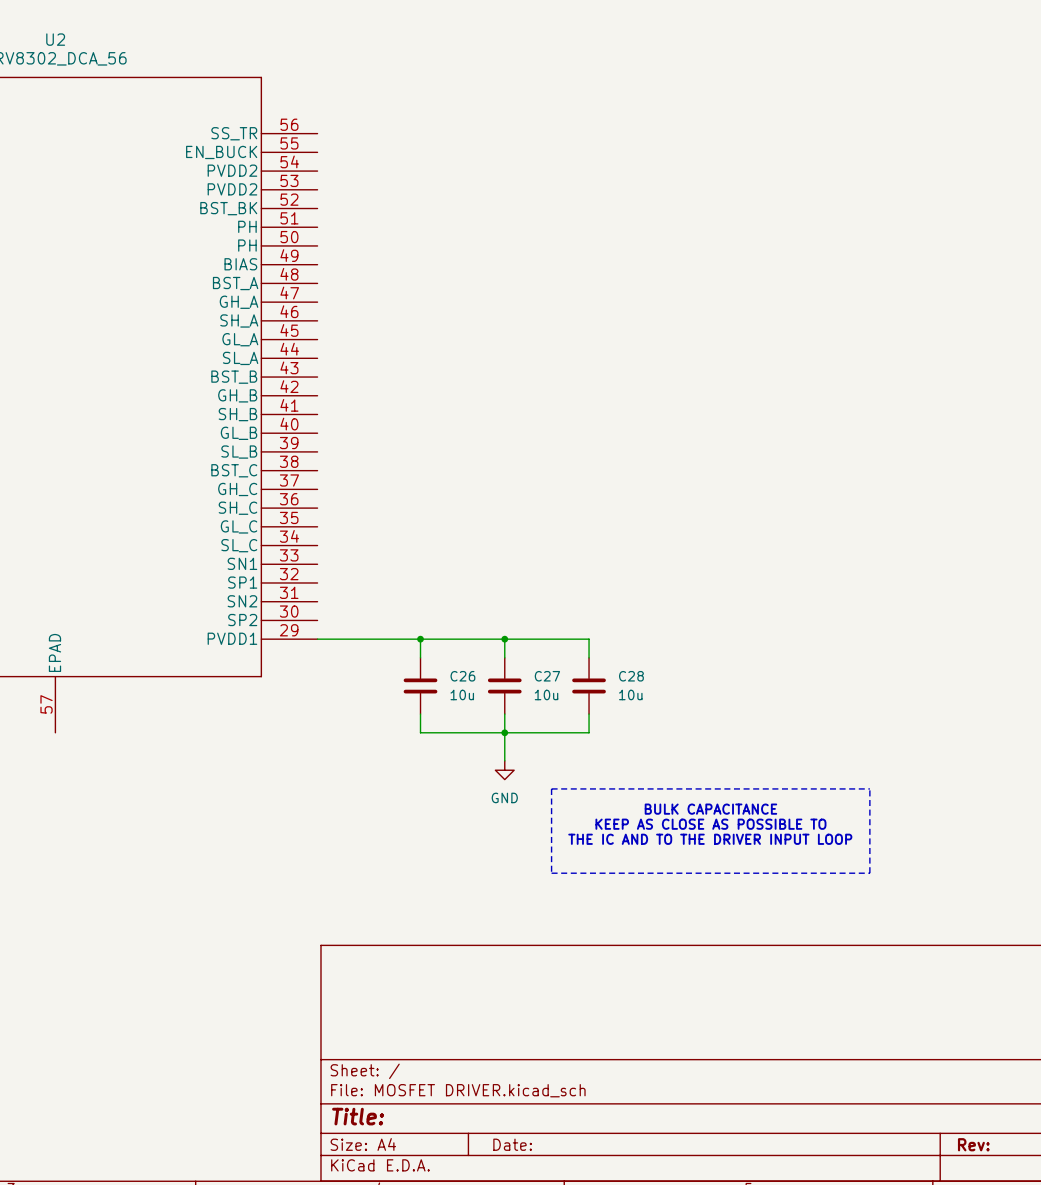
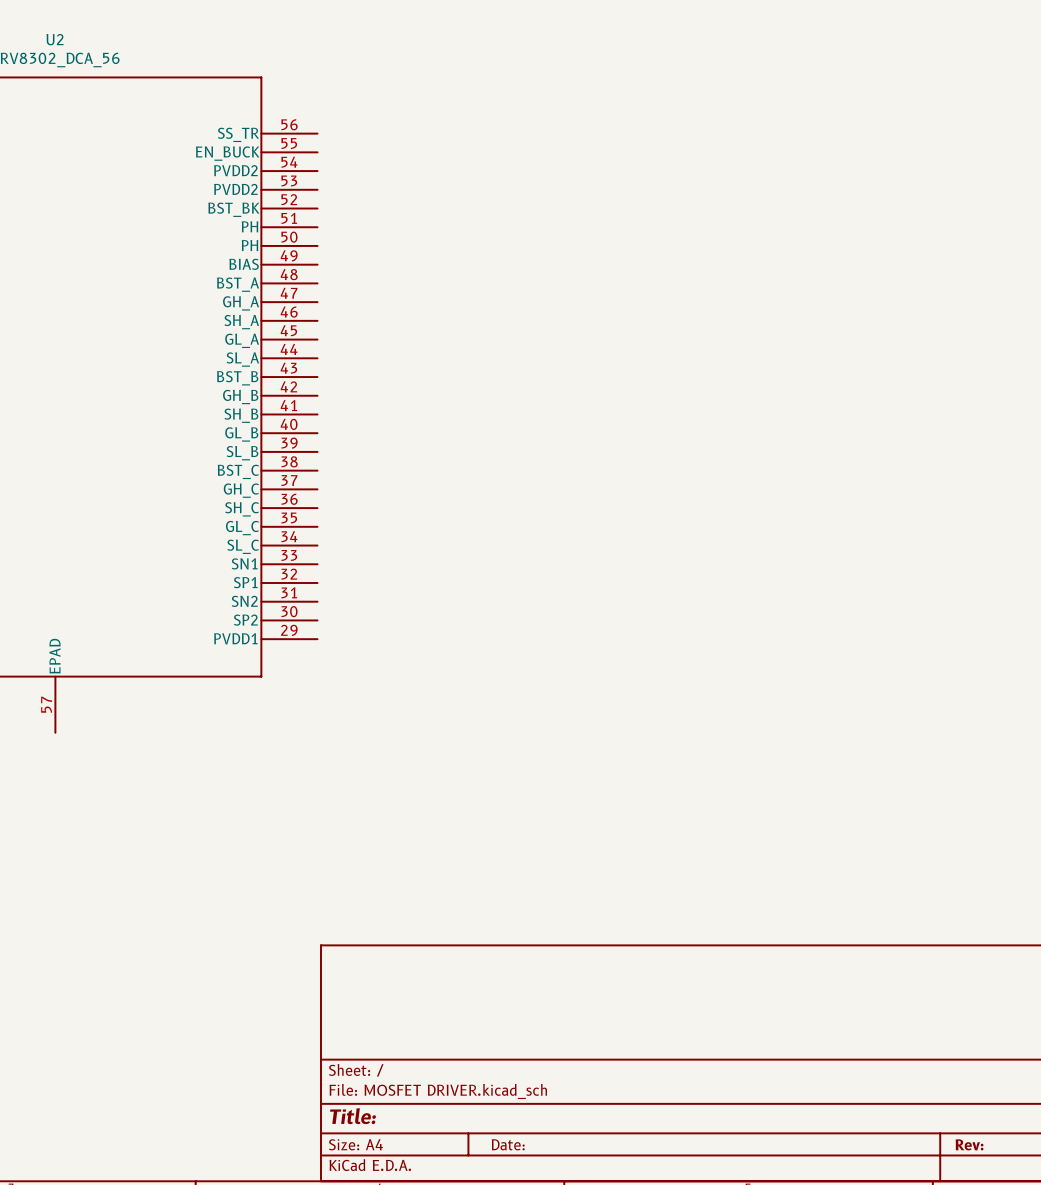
wire: (317, 639) (589, 639) (589, 657) -> none
wire: (420, 639) (420, 657) -> none
junction: (420, 639) -> none
wire: (504, 639) (504, 657) -> none
junction: (504, 639) -> none
C26: 10u (420, 685) -> none
C27: 10u (504, 685) -> none
C28: 10u (589, 685) -> none
wire: (420, 714) (420, 732) (589, 732) (589, 714) -> none
wire: (504, 714) (504, 760) -> none
junction: (504, 732) -> none
power symbol: GND (504, 770) -> none
line: (551, 788) (869, 788) (869, 873) (551, 873) (551, 788) -> none
text: BULK CAPACITANCE (710, 809) -> none
text: KEEP AS CLOSE AS POSSIBLE TO (710, 824) -> none
text: THE IC AND TO THE DRIVER INPUT LOOP (710, 839) -> none

